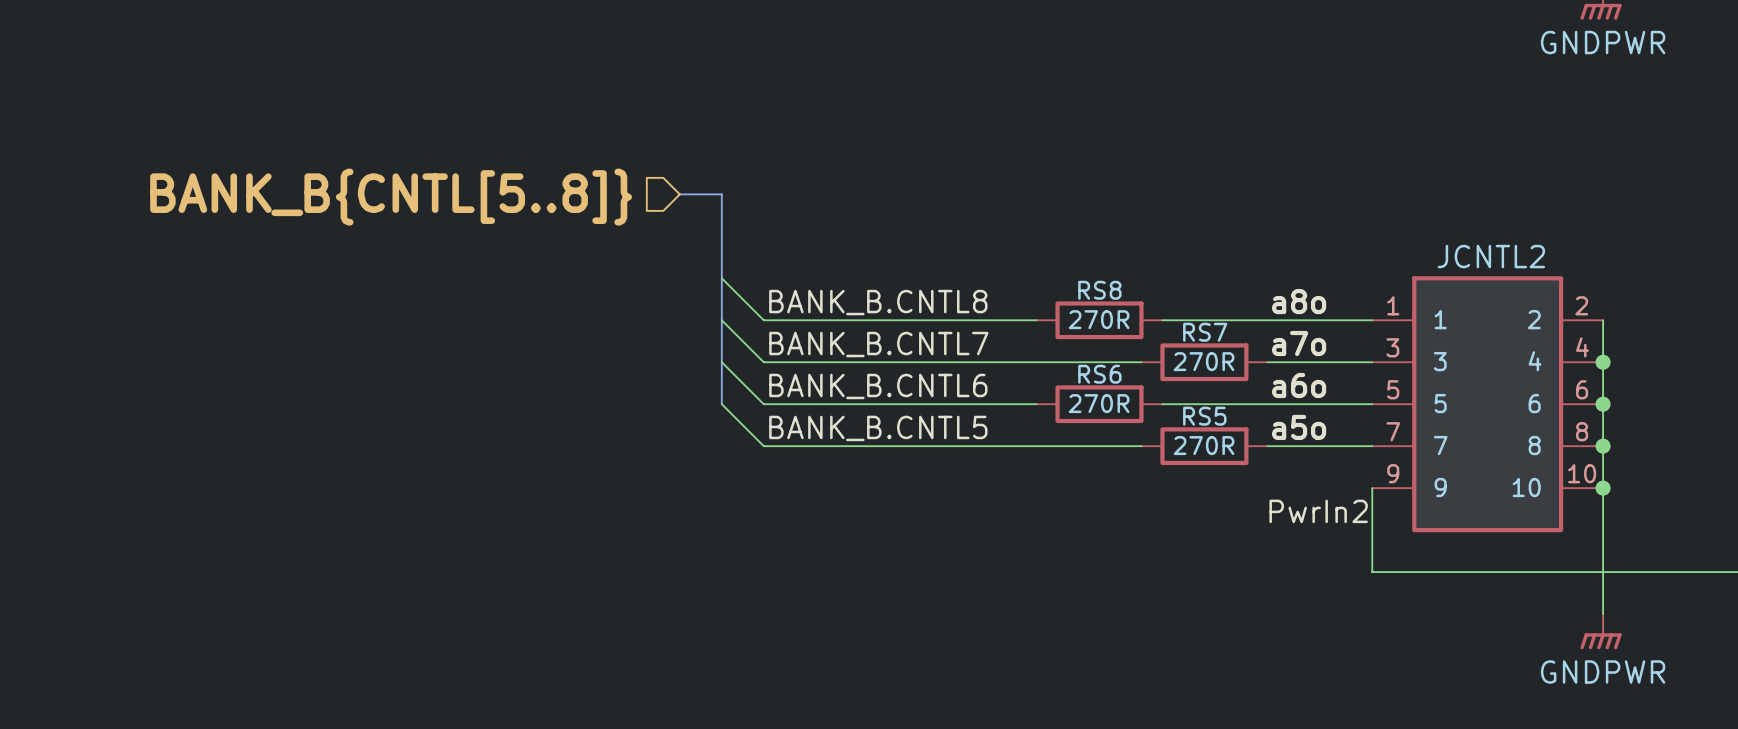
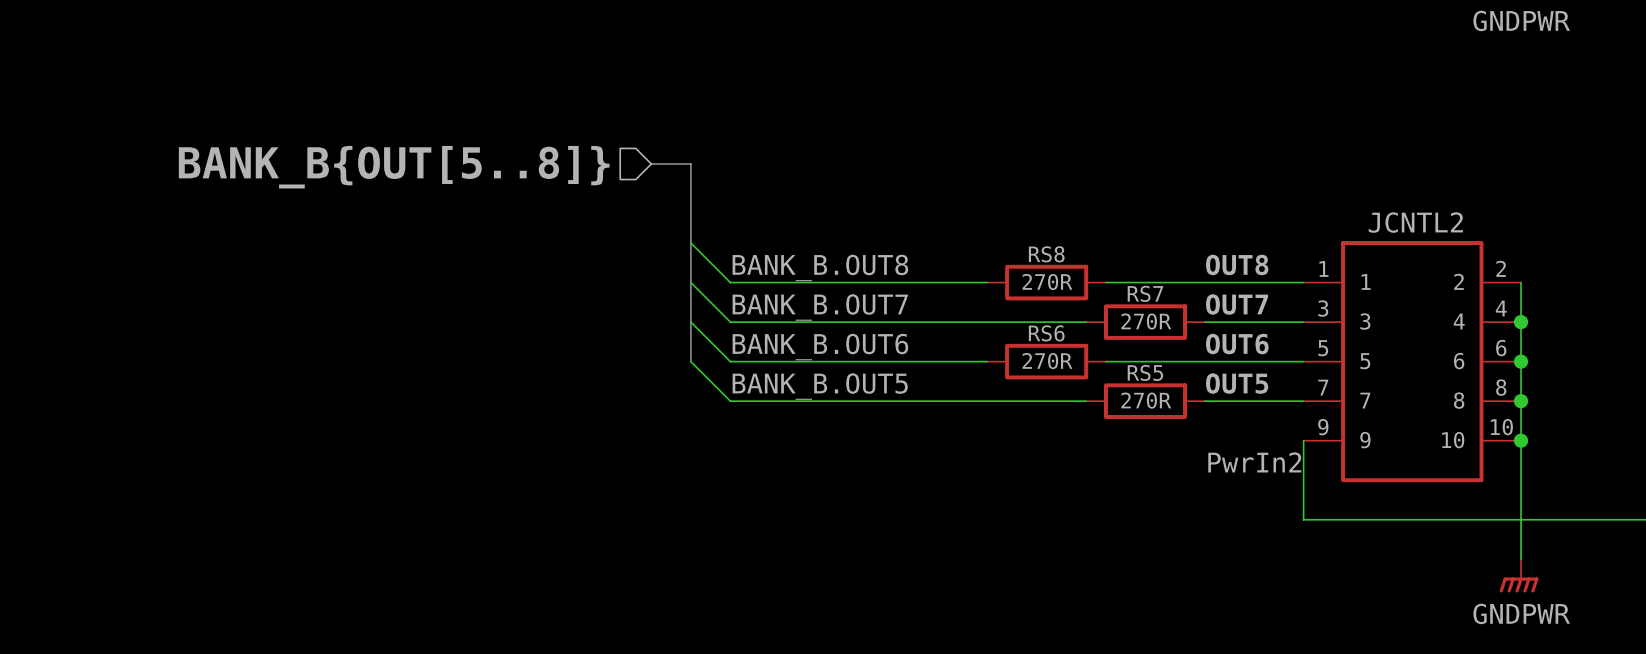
hierarchical label: BANK_B{CNTL[5..8]} (391, 197) -> BANK_B{OUT[5..8]} (394, 167)
label: a8o (1299, 301) -> OUT8 (1237, 264)
label: BANK_B.CNTL8 (878, 302) -> BANK_B.OUT8 (820, 267)
label: a7o (1299, 343) -> OUT7 (1237, 304)
label: BANK_B.CNTL7 (878, 344) -> BANK_B.OUT7 (820, 307)
label: a6o (1299, 385) -> OUT6 (1237, 344)
label: BANK_B.CNTL6 (878, 386) -> BANK_B.OUT6 (820, 347)
label: a5o (1299, 427) -> OUT5 (1237, 383)
label: BANK_B.CNTL5 (878, 428) -> BANK_B.OUT5 (820, 386)

